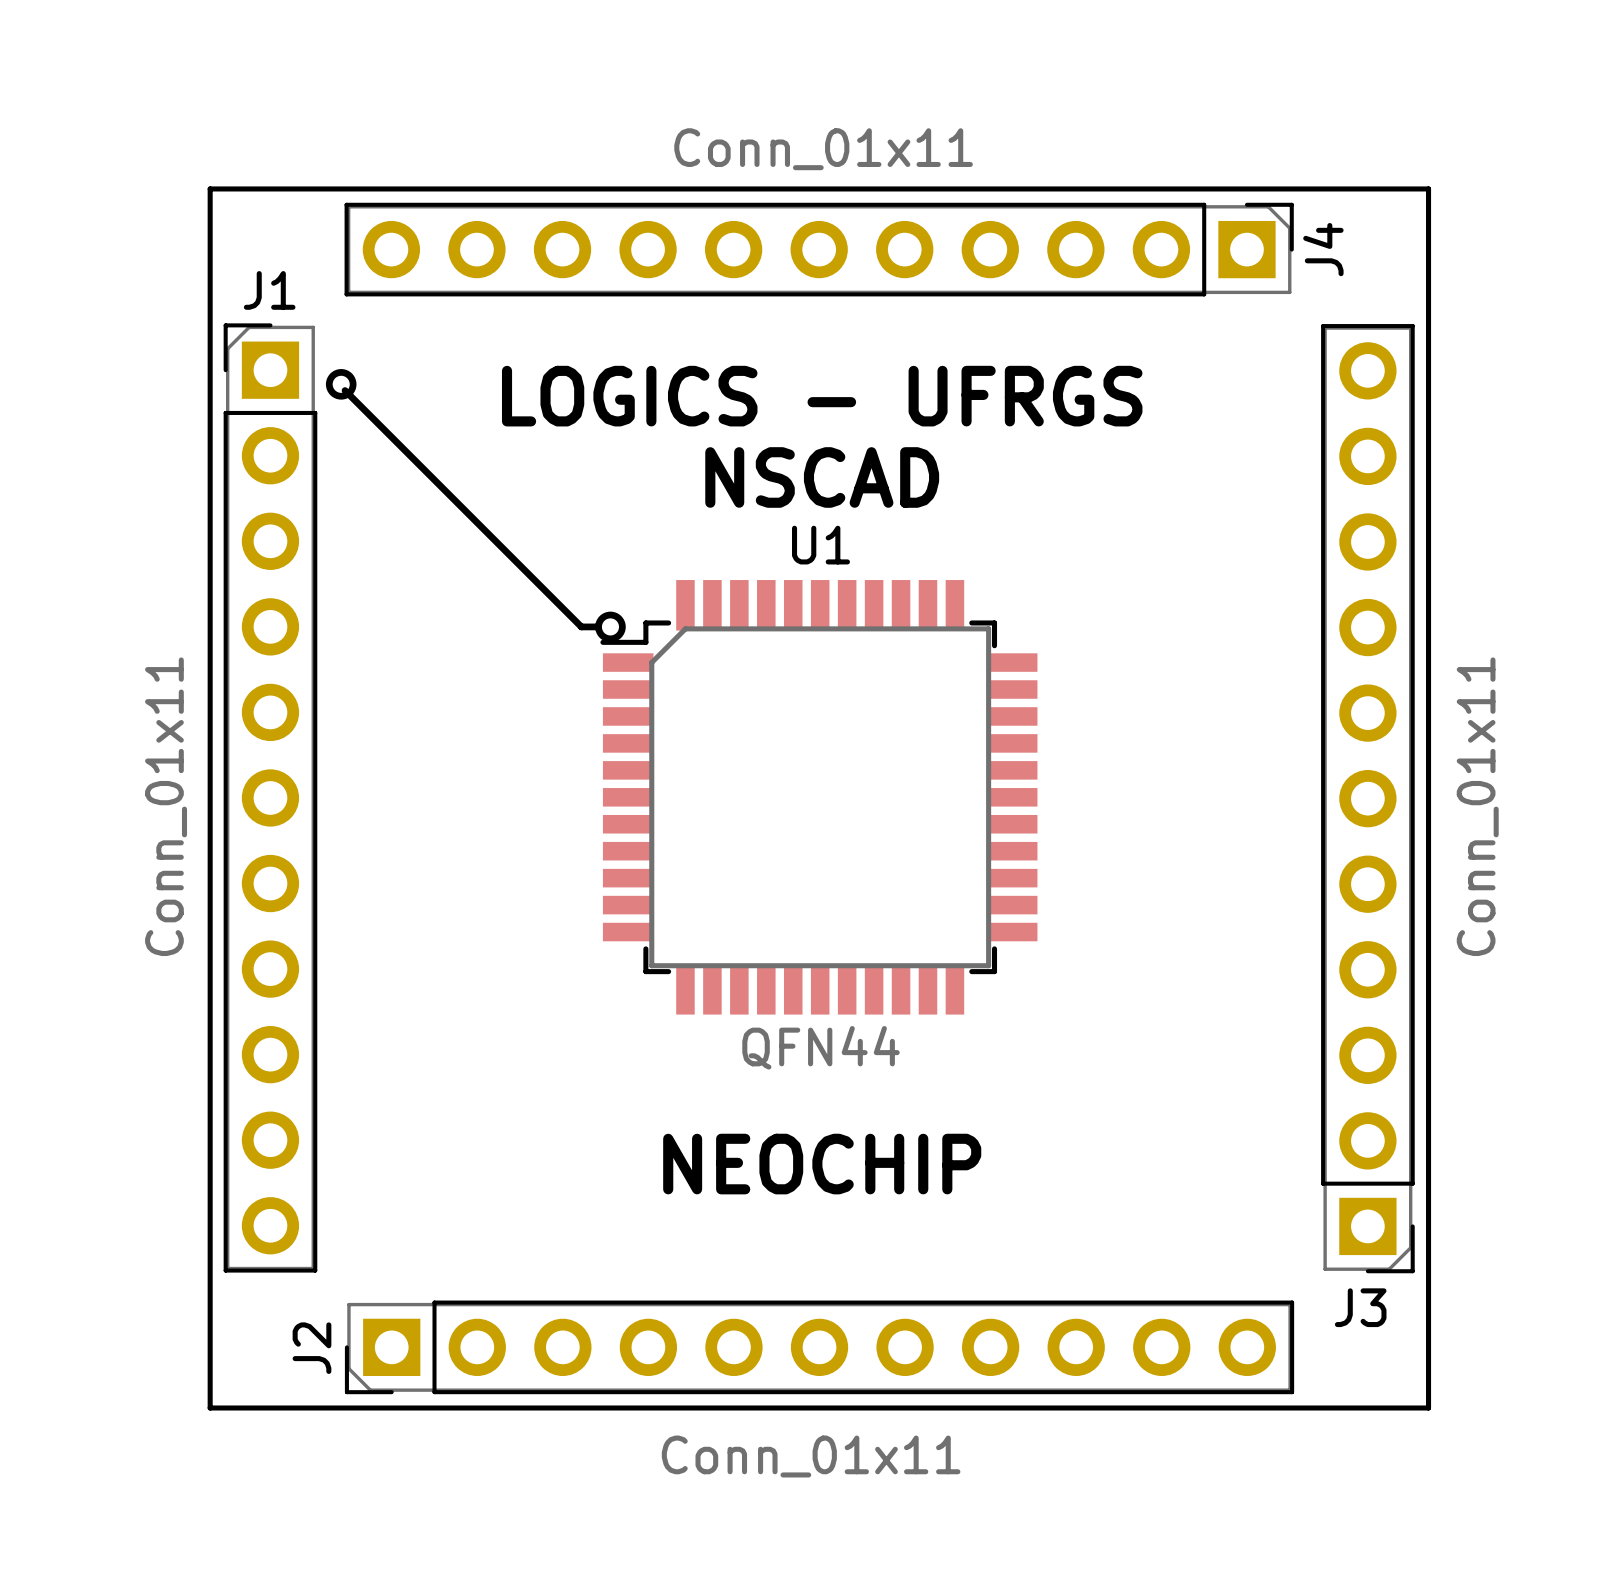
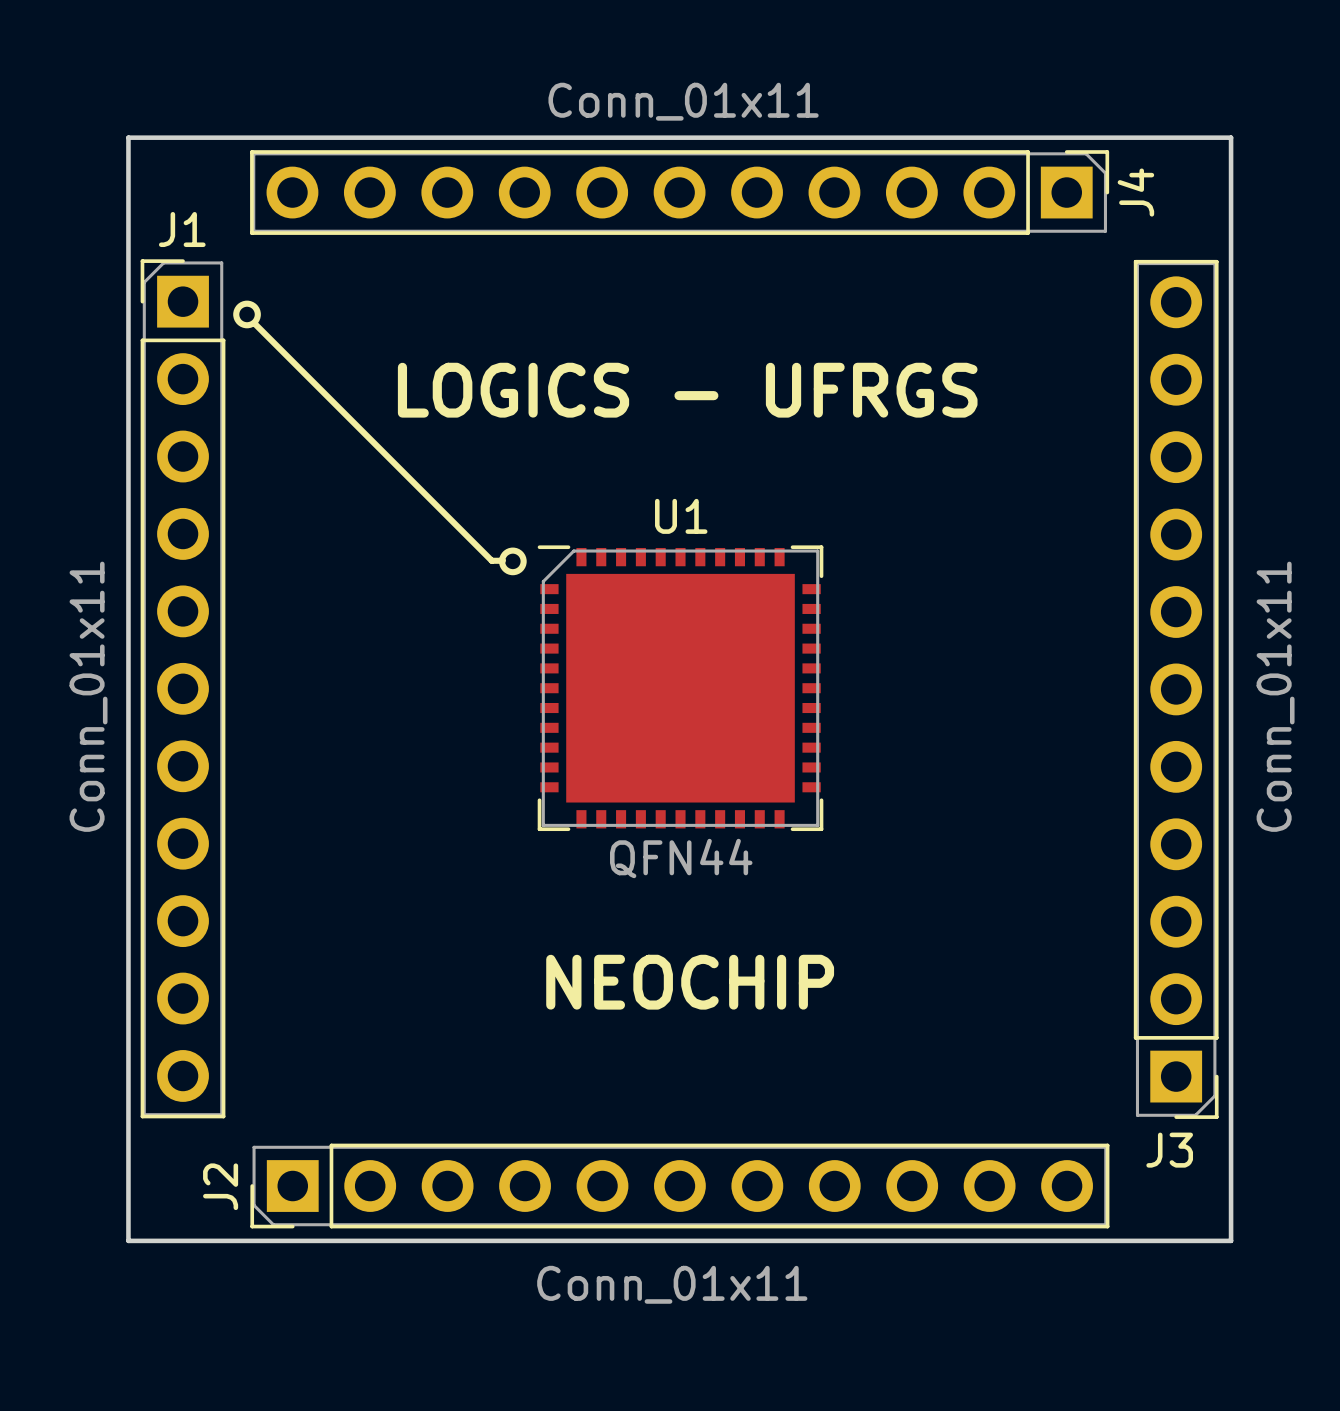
line: (345, 390) (581, 626) (598, 626) -> none
line: none -> (254, 323) (491, 560) (502, 560)
text: LOGICS - UFRGS (822, 396) -> none
text: NSCAD (822, 477) -> LOGICS - UFRGS (687, 390)
U1 footprint: [600, 580, 1038, 1015] -> [537, 545, 824, 832]
drawing position: (610, 626) -> (512, 561)
text position: NEOCHIP (822, 1164) -> NEOCHIP (690, 982)

